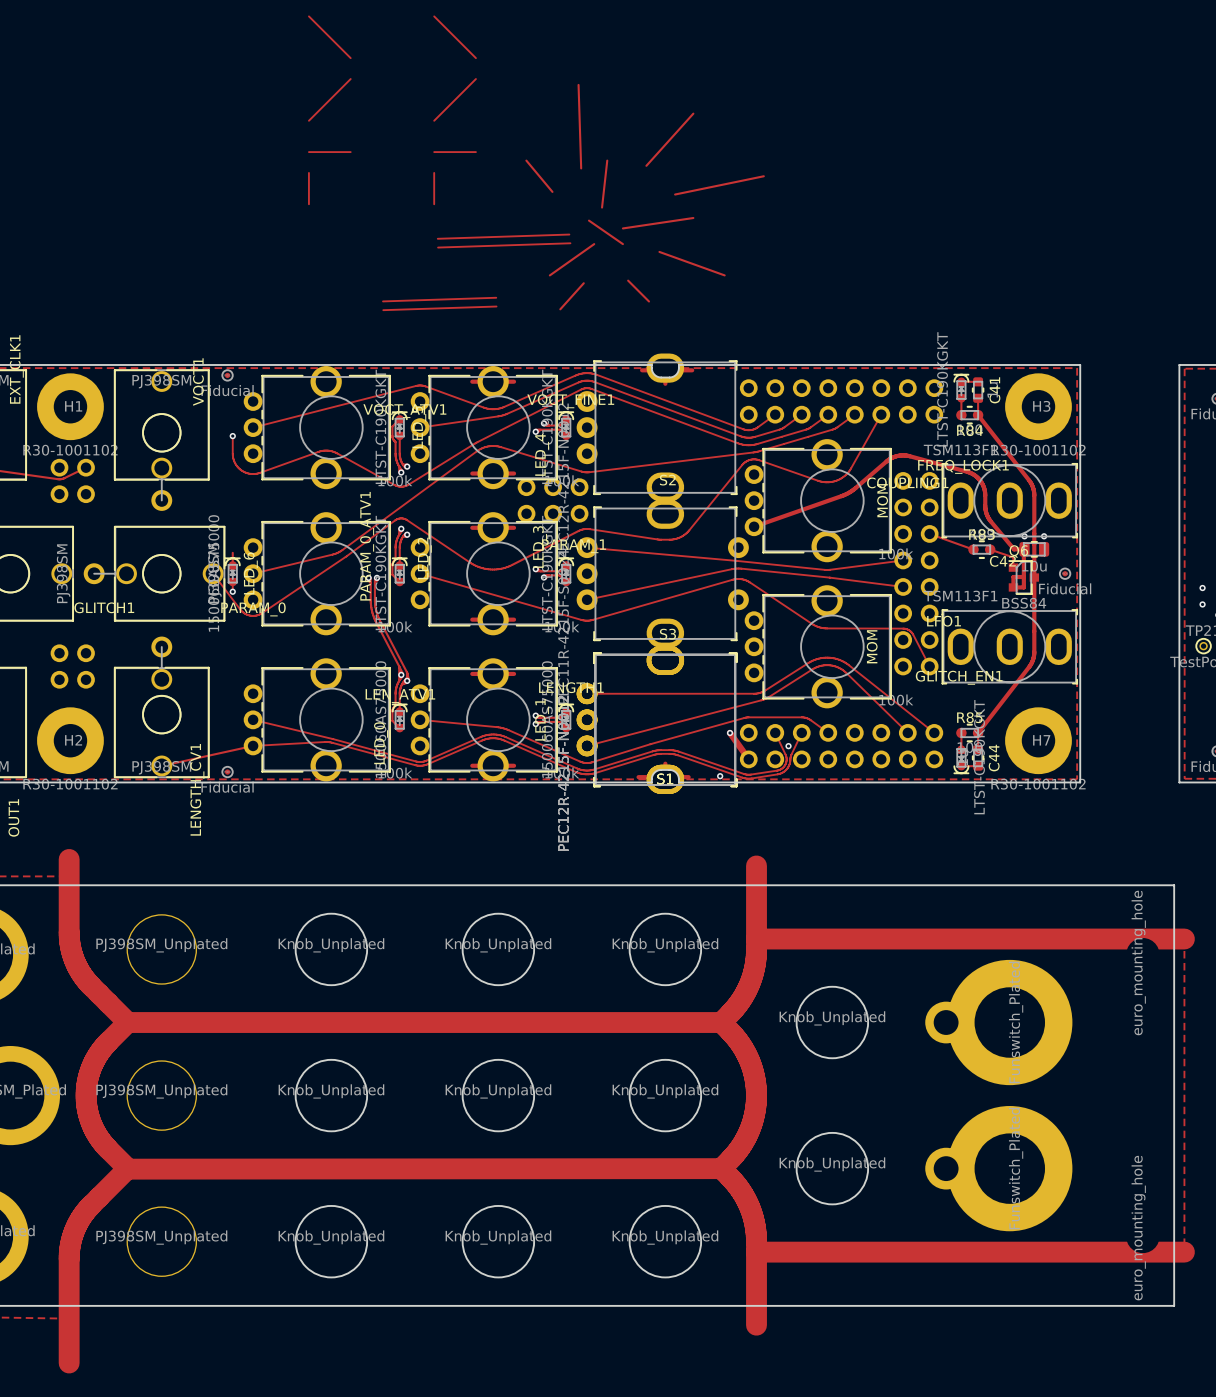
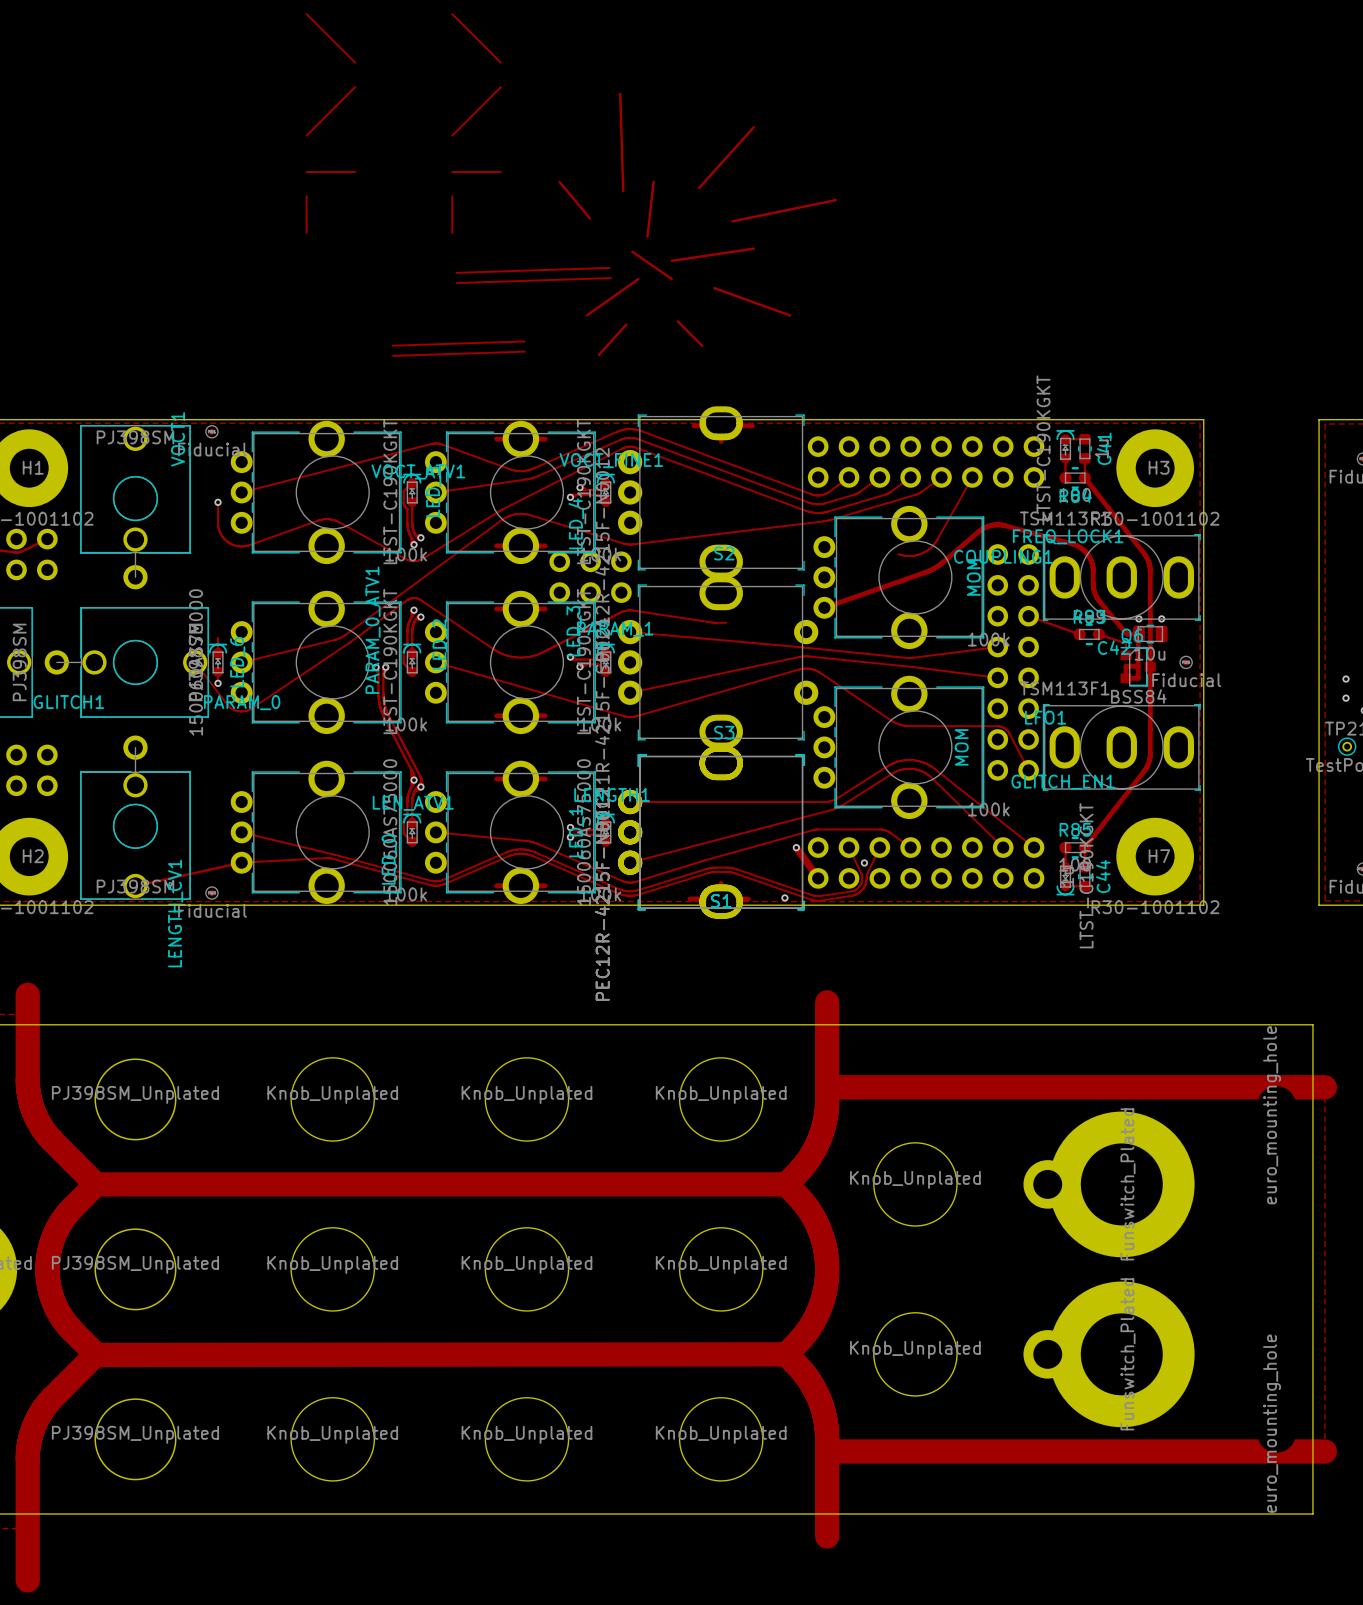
track: (851, 468) (839, 479) (825, 482) (758, 459) (748, 460) (742, 464) (687, 532) (679, 537) (669, 539) -> (937, 539) (929, 548) (920, 554) (910, 556) (898, 554)

